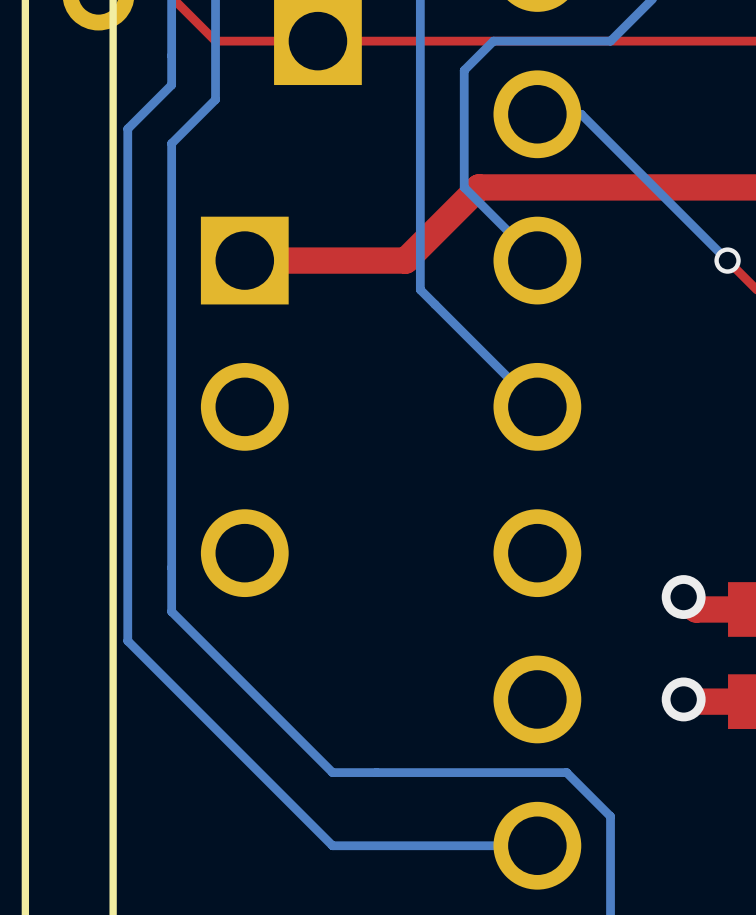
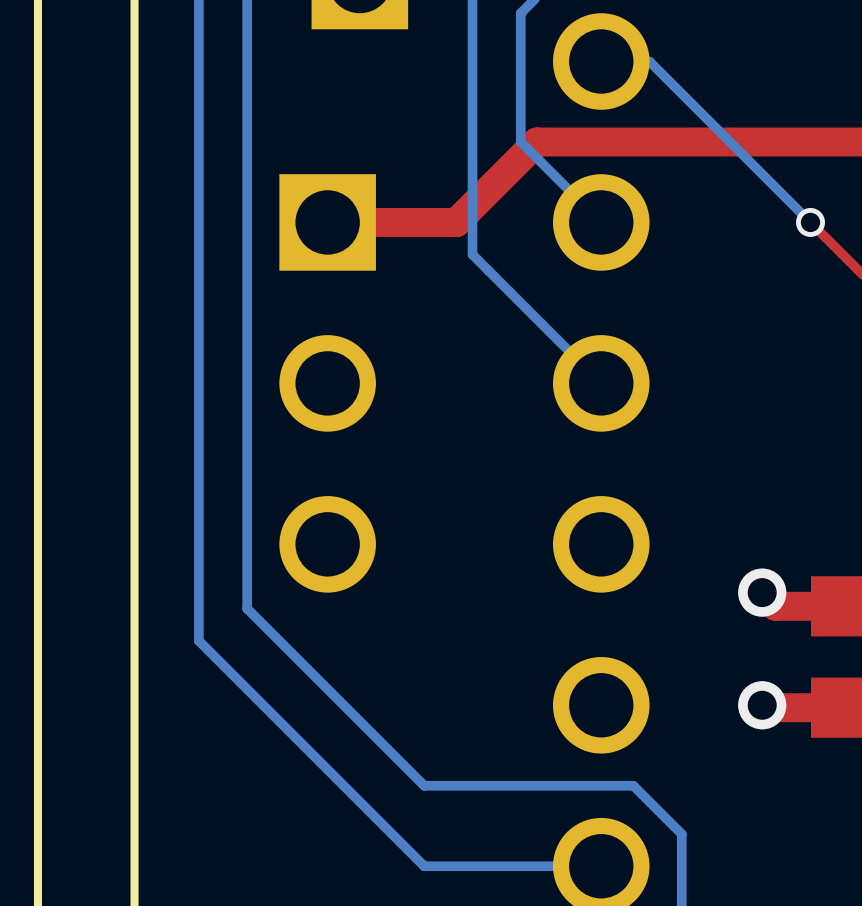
bottom track: (171, 85) (127, 128) (127, 640) (332, 845) (376, 845) -> none
bottom track: (215, 99) (171, 143) -> (198, 29) (198, 93)
bottom track: none -> (247, 45) (247, 608) (424, 785)
part position: (244, 406) -> (327, 383)
bottom track: (171, 611) (332, 772) (376, 772) -> (198, 608) (198, 640) (424, 866)

